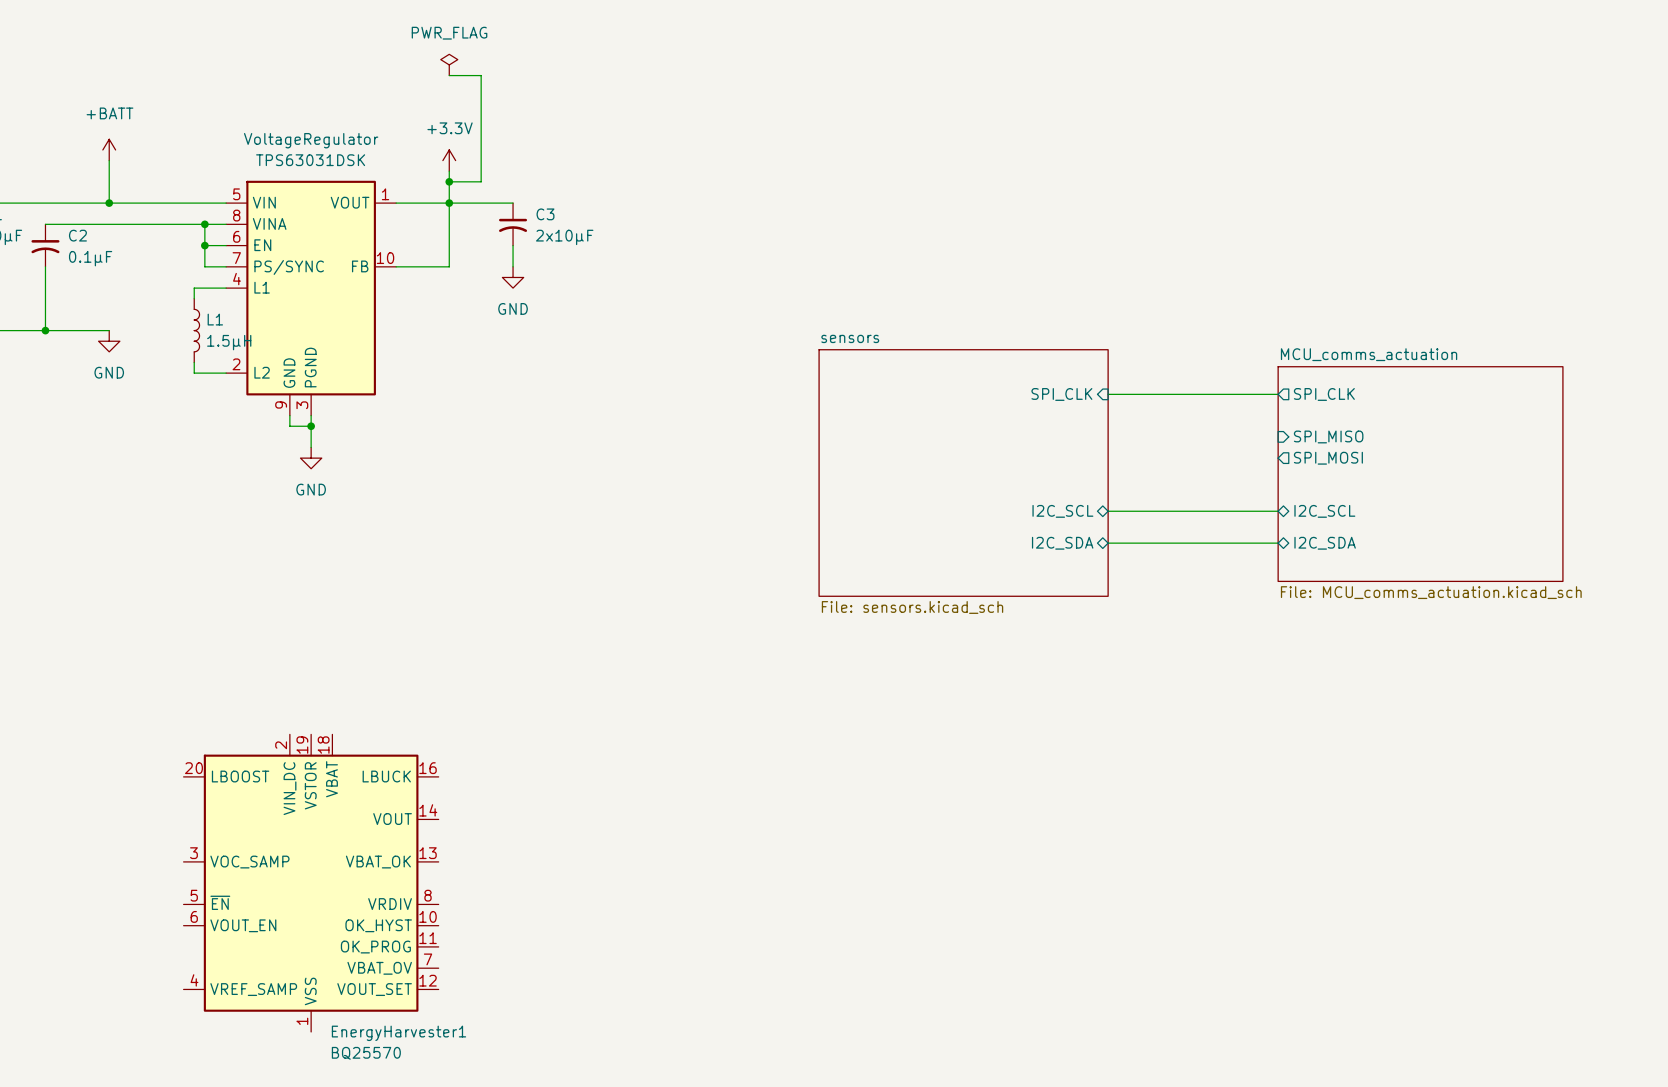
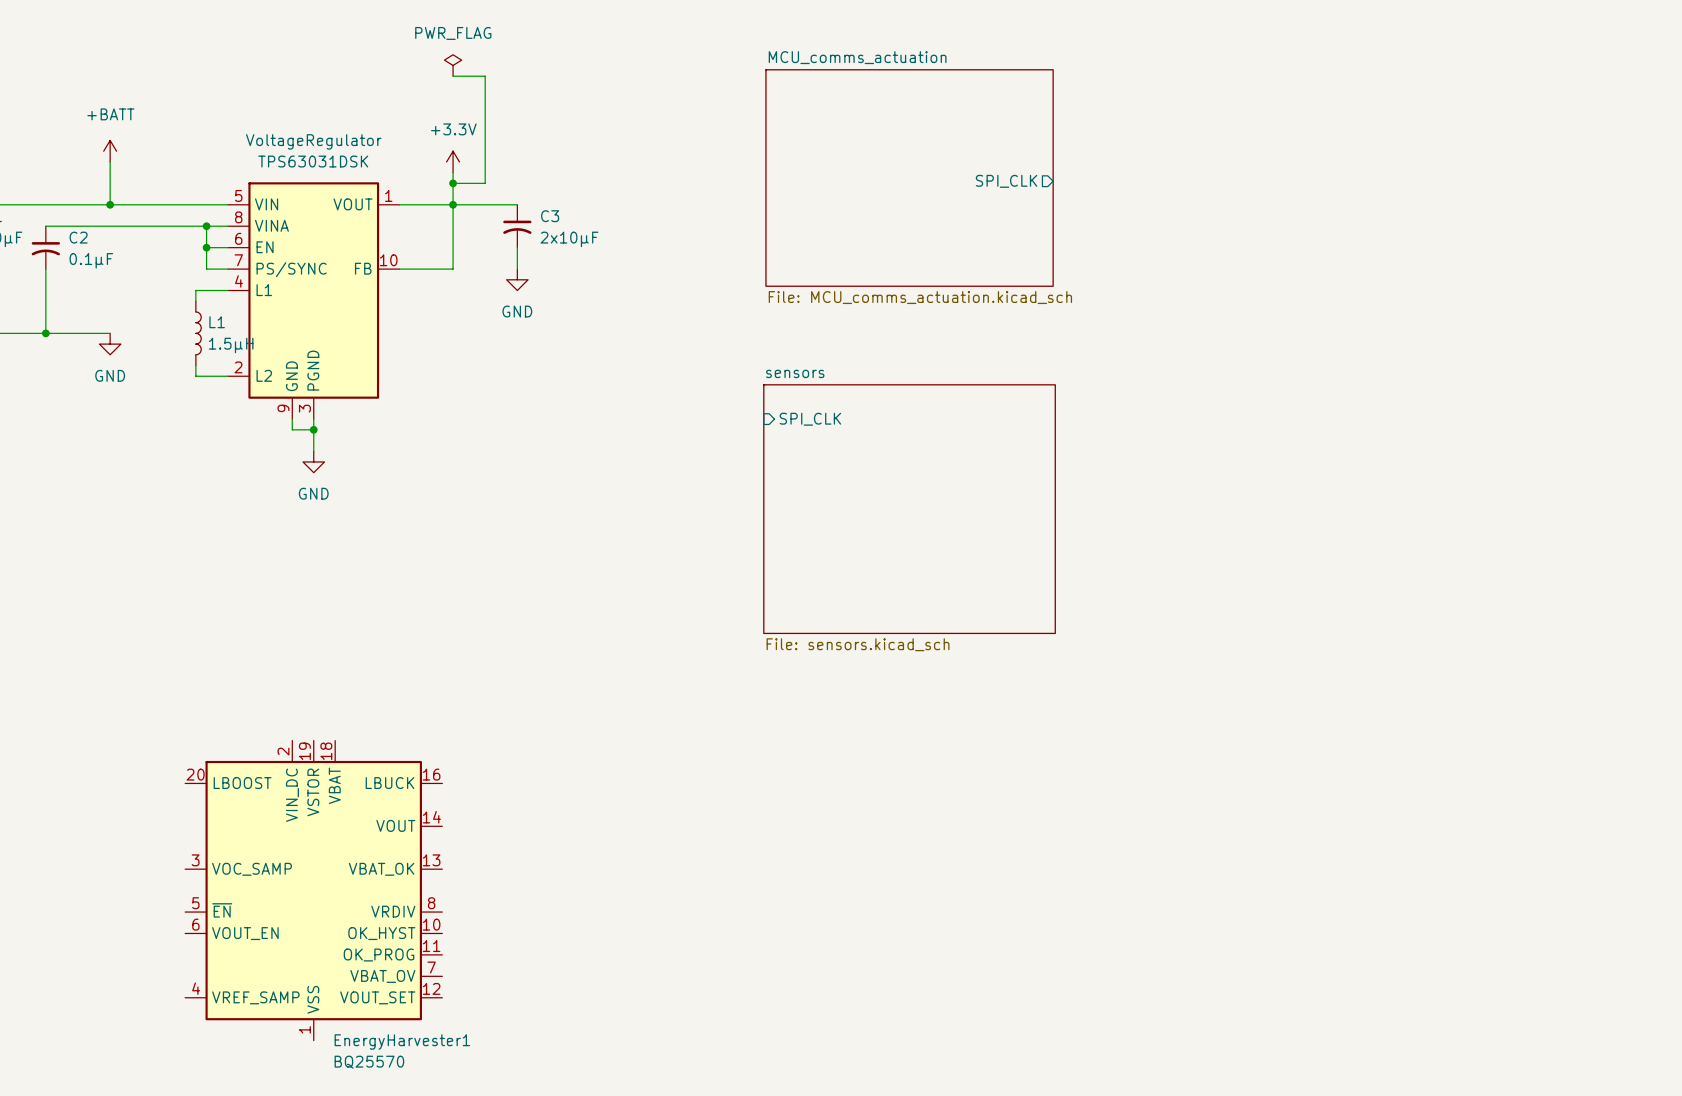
sheet MCU_comms_actuation: none -> File: MCU_comms_actuation.kicad_sch (909, 178)
sheet pin: none -> SPI_CLK (1006, 181)
sheet pin: SPI_CLK (1061, 394) -> none
wire: (1108, 394) (1278, 394) -> none
sheet pin: SPI_CLK (1324, 394) -> none
sheet pin: none -> SPI_CLK (810, 419)
sheet pin: SPI_MISO (1328, 436) -> none
sheet pin: SPI_MOSI (1328, 458) -> none
sheet sensors position: (963, 473) -> (909, 509)
sheet MCU_comms_actuation: File: MCU_comms_actuation.kicad_sch (1420, 474) -> none
sheet pin: I2C_SCL (1062, 511) -> none
wire: (1108, 511) (1278, 511) -> none
sheet pin: I2C_SCL (1324, 511) -> none
sheet pin: I2C_SDA (1062, 543) -> none
wire: (1108, 543) (1278, 543) -> none
sheet pin: I2C_SDA (1325, 543) -> none

